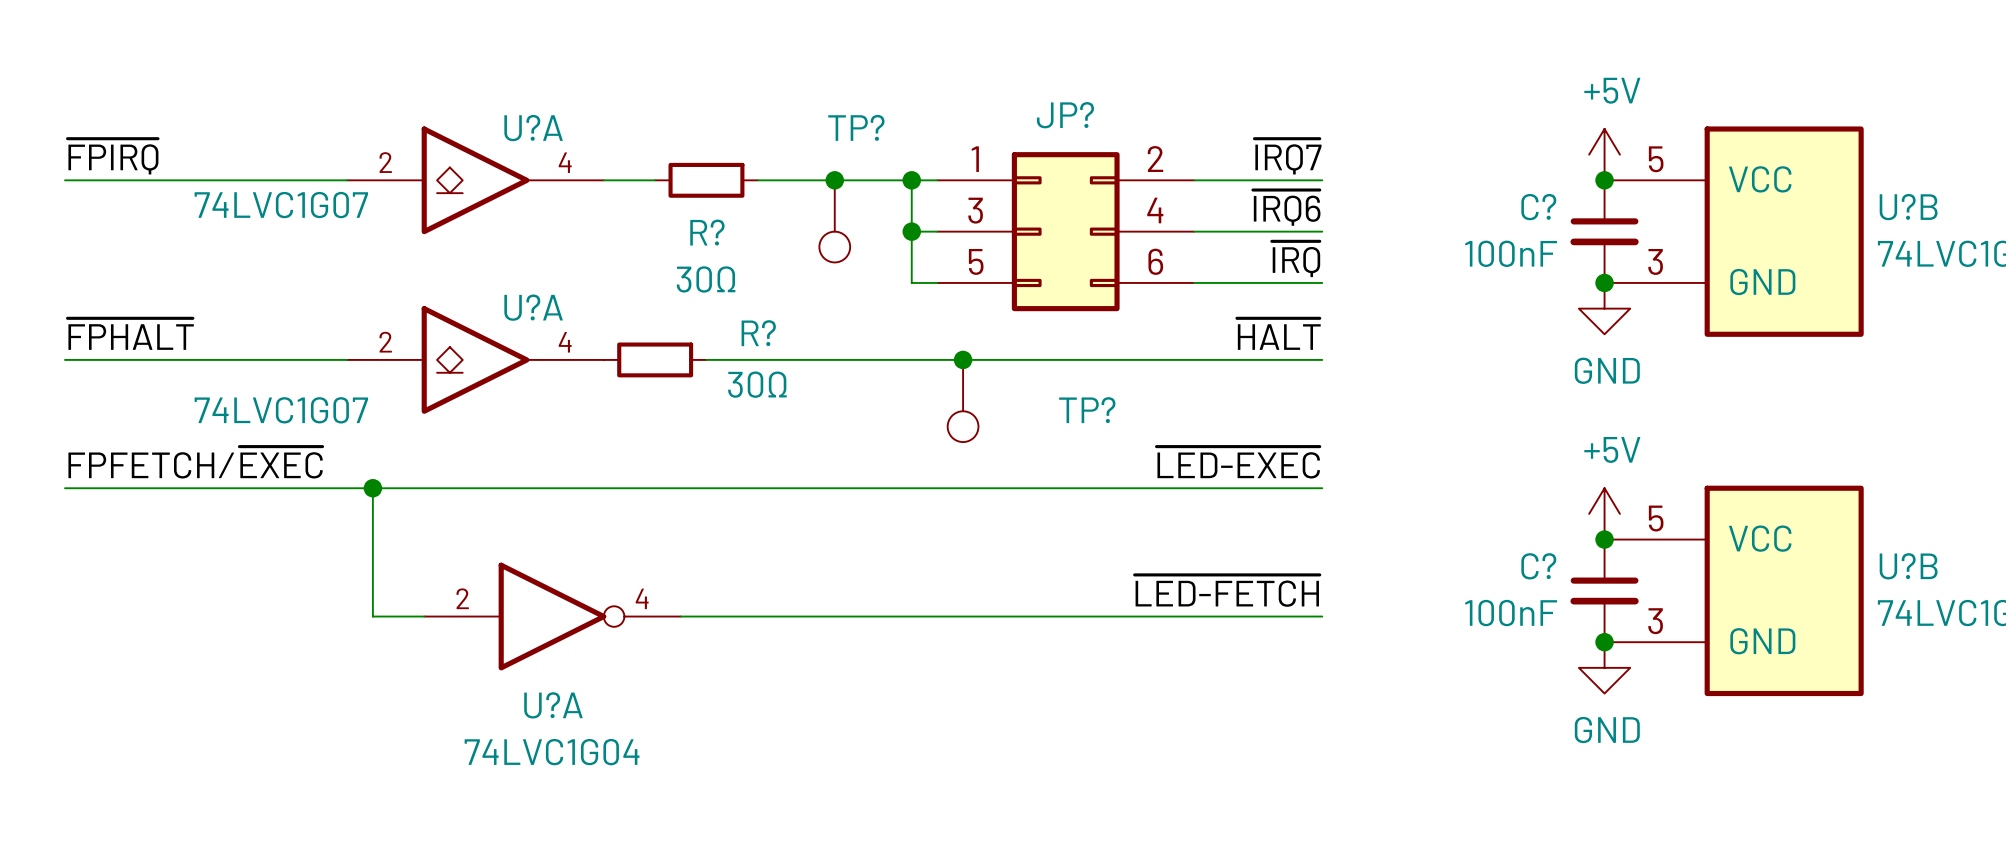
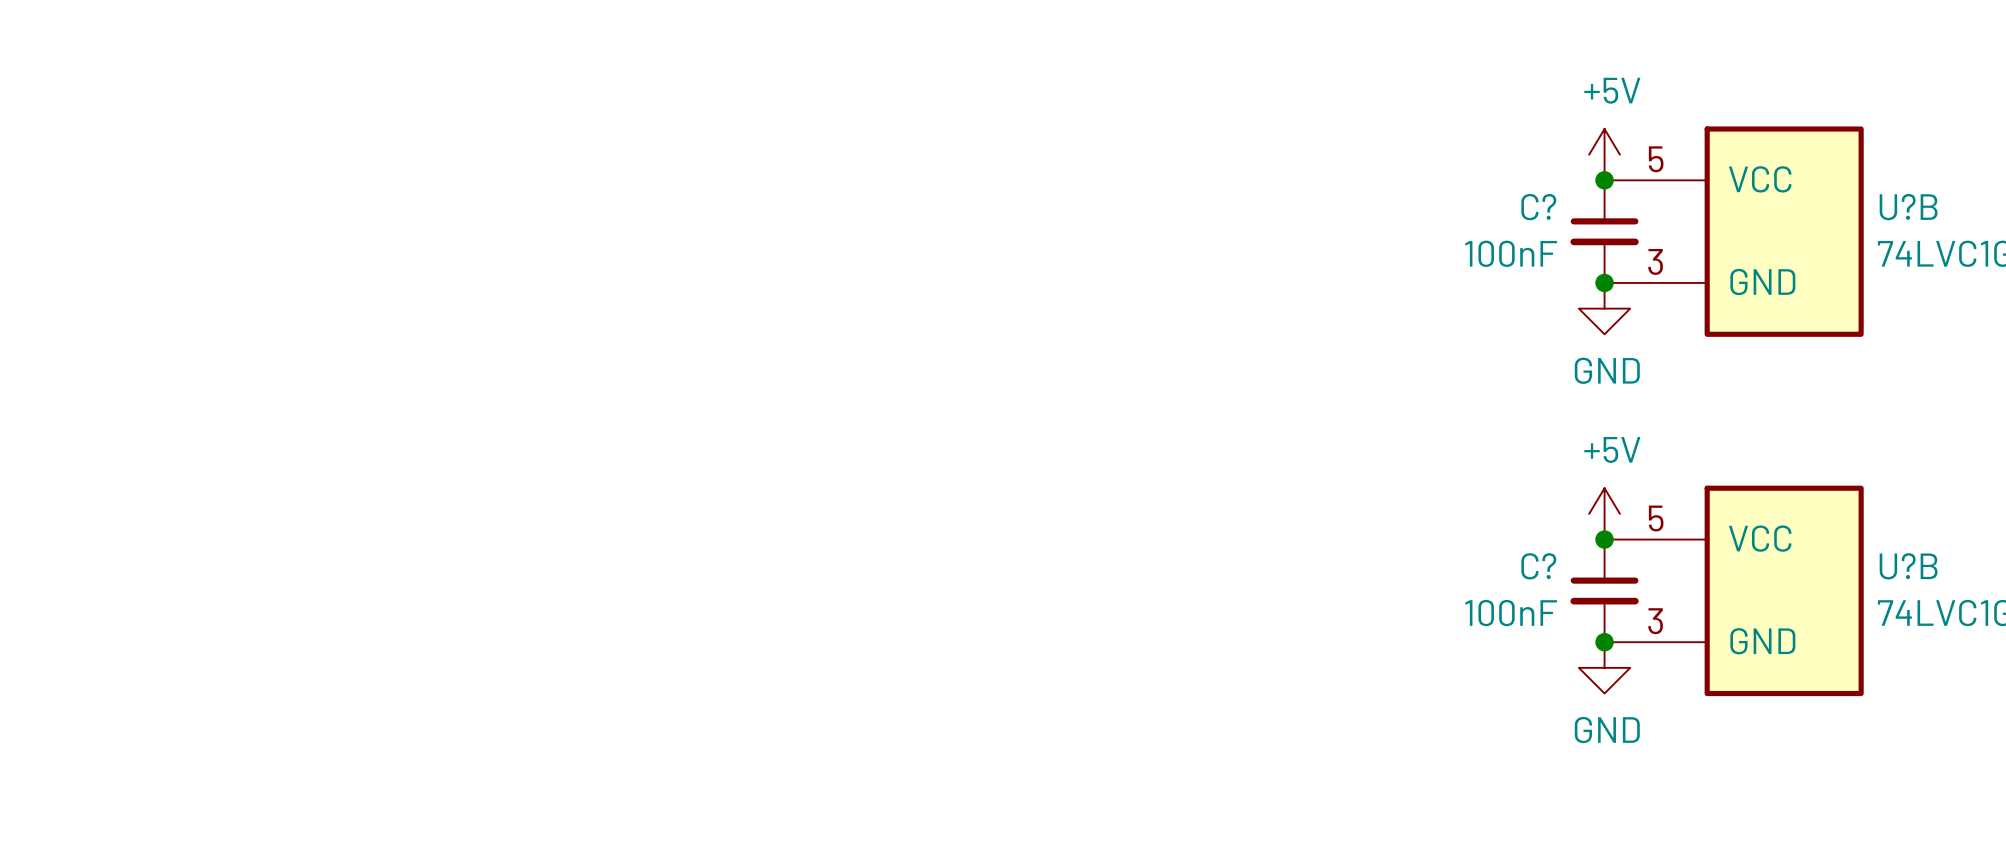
label: ~{FPIRQ} (112, 156) -> none
label: ~{IRQ7} (1287, 156) -> none
wire: (64, 180) (347, 180) -> none
U?A: 74LVC1G07 (475, 180) -> none
wire: (603, 180) (655, 180) -> none
R?: 30Ω (706, 180) -> none
wire: (757, 180) (937, 180) -> none
junction: (834, 180) -> none
wire: (911, 180) (911, 282) (937, 282) -> none
junction: (911, 180) -> none
wire: (1194, 180) (1322, 180) -> none
label: ~{IRQ6} (1286, 207) -> none
TP?: (834, 221) -> none
wire: (911, 231) (937, 231) -> none
junction: (911, 231) -> none
JP?: (1065, 231) -> none
wire: (1194, 231) (1322, 231) -> none
label: ~{IRQ} (1295, 259) -> none
wire: (1194, 282) (1322, 282) -> none
label: ~{FPHALT} (130, 334) -> none
label: ~{HALT} (1278, 334) -> none
wire: (64, 359) (347, 359) -> none
U?A: 74LVC1G07 (475, 359) -> none
R?: 30Ω (655, 359) -> none
wire: (706, 359) (1322, 359) -> none
junction: (963, 359) -> none
TP?: (963, 401) -> none
label: FPFETCH∕~{EXEC} (195, 462) -> none
label: ~{LED-EXEC} (1238, 462) -> none
wire: (64, 488) (1322, 488) -> none
wire: (372, 488) (372, 616) (424, 616) -> none
junction: (372, 488) -> none
label: ~{LED-FETCH} (1227, 590) -> none
U?A: 74LVC1G04 (552, 616) -> none
wire: (680, 616) (1322, 616) -> none

